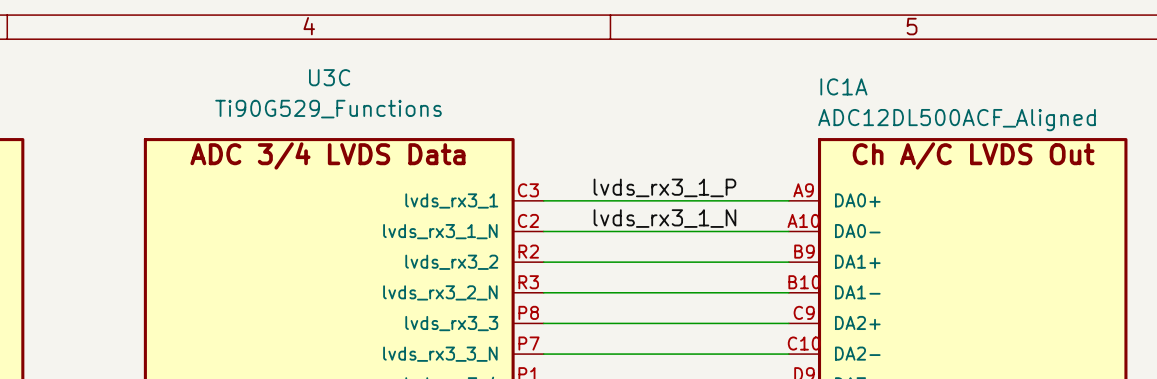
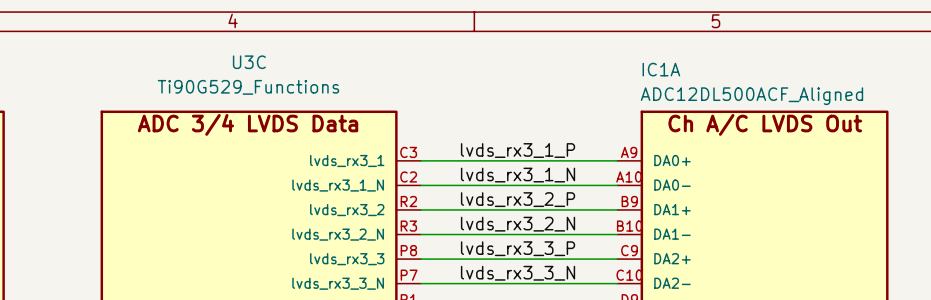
label: none -> lvds_rx3_2_P (518, 199)
label: none -> lvds_rx3_2_N (518, 224)
label: none -> lvds_rx3_3_P (518, 248)
label: none -> lvds_rx3_3_N (518, 273)

